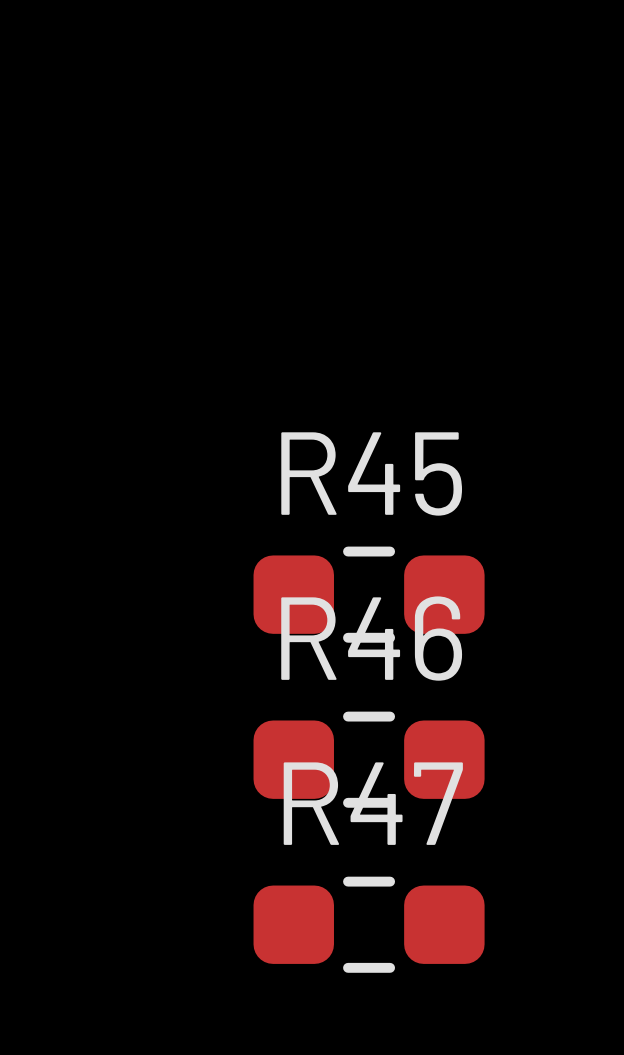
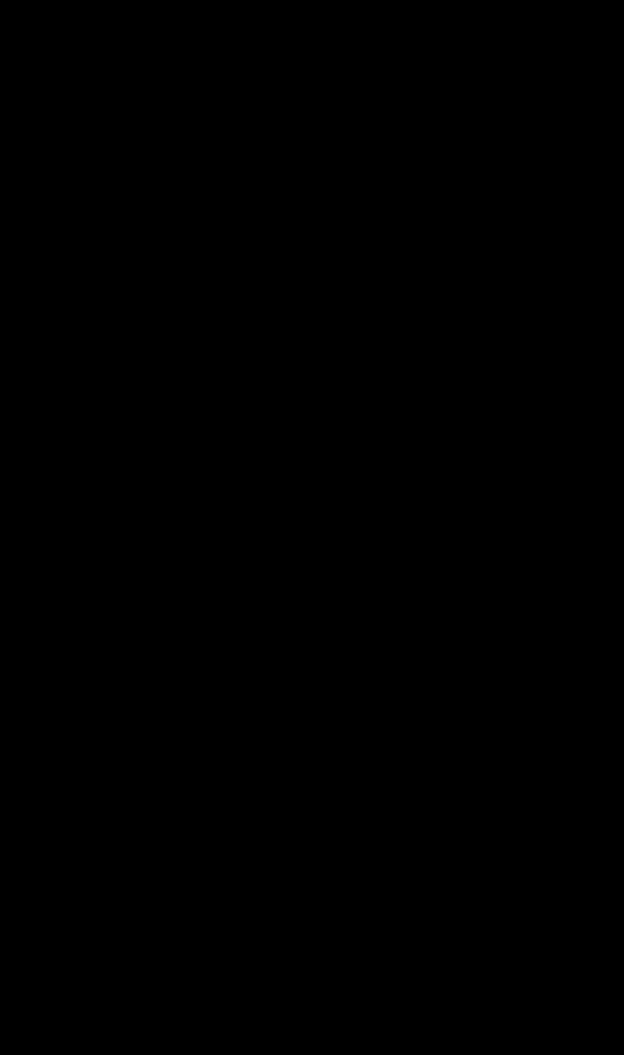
R45: (369, 594) -> none
R46: (369, 759) -> none
R47: (369, 924) -> none

